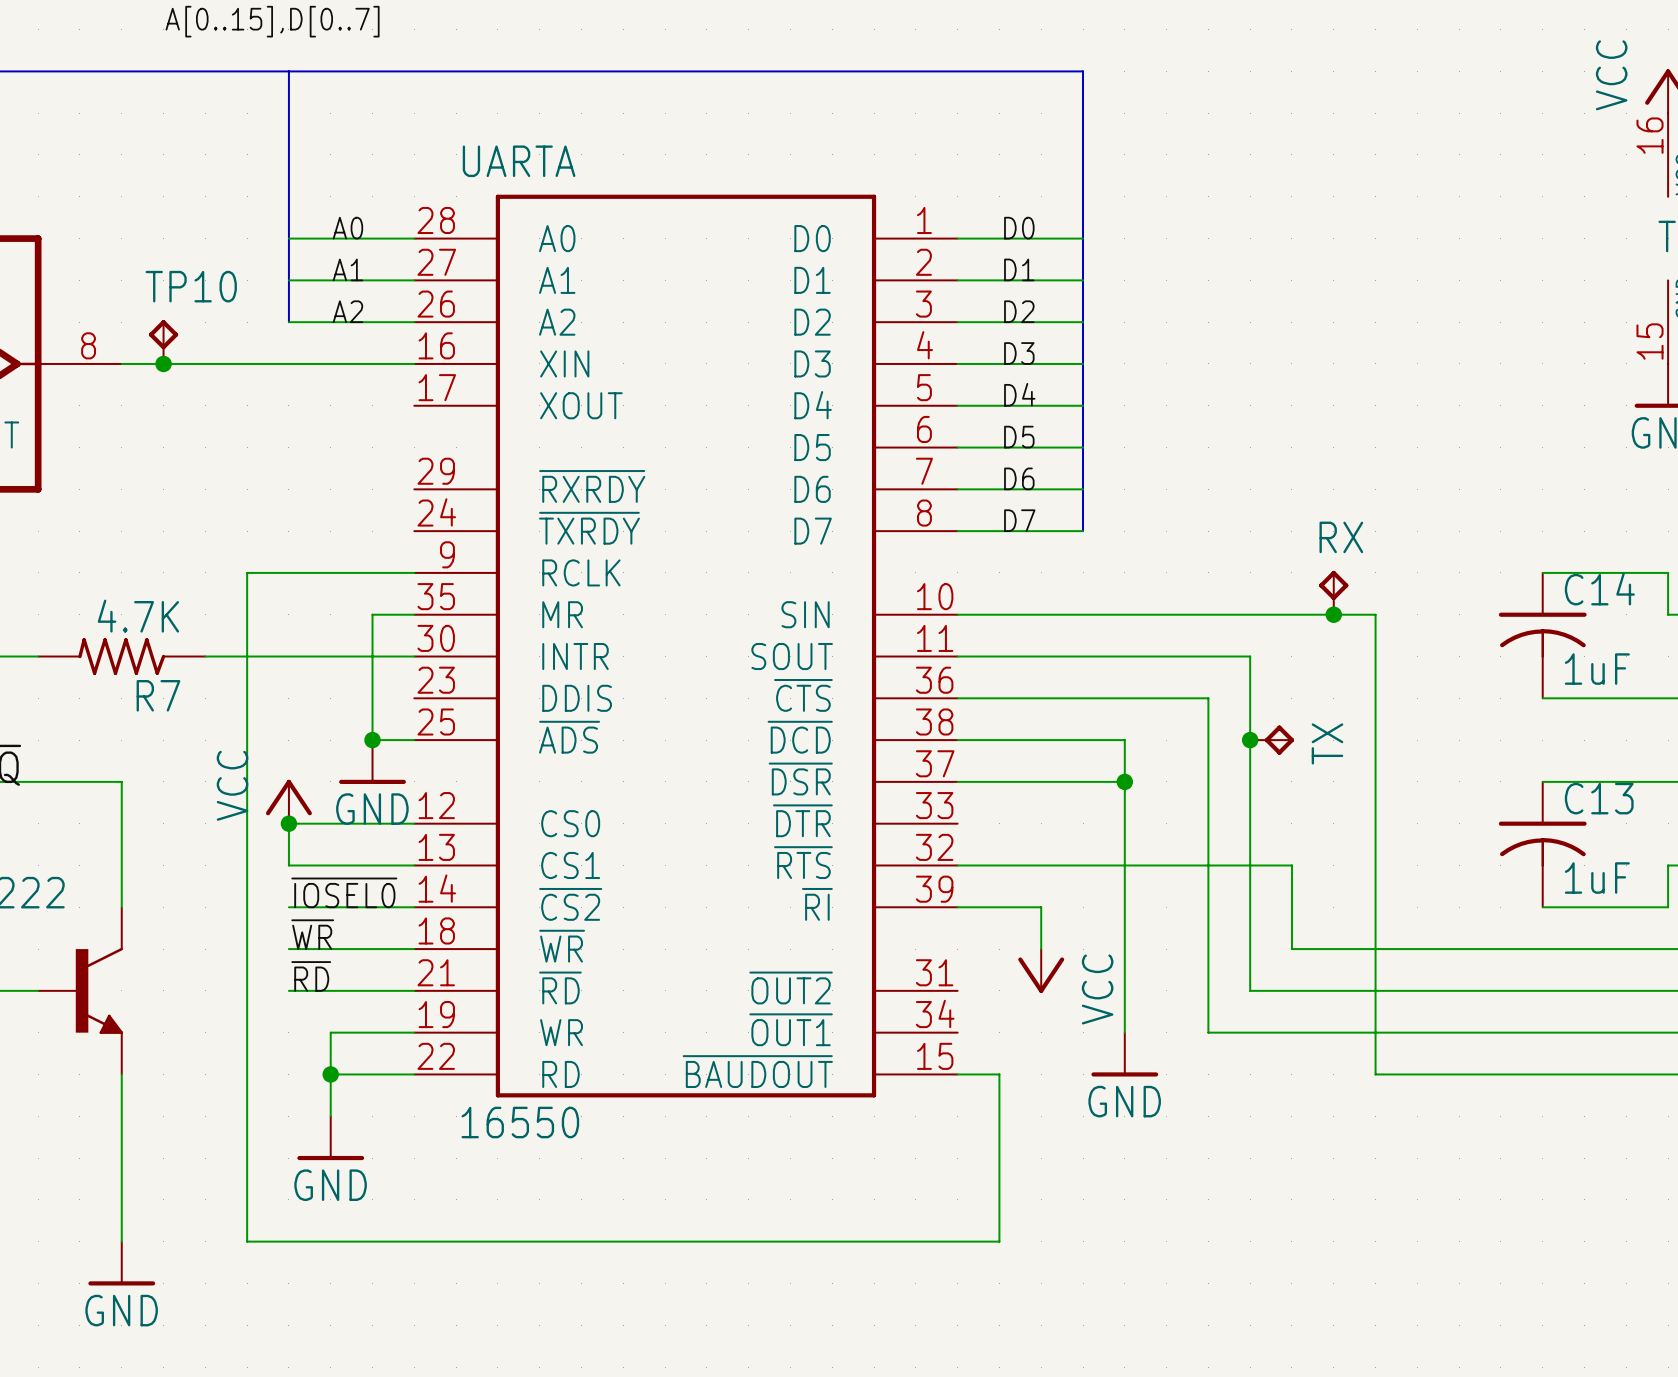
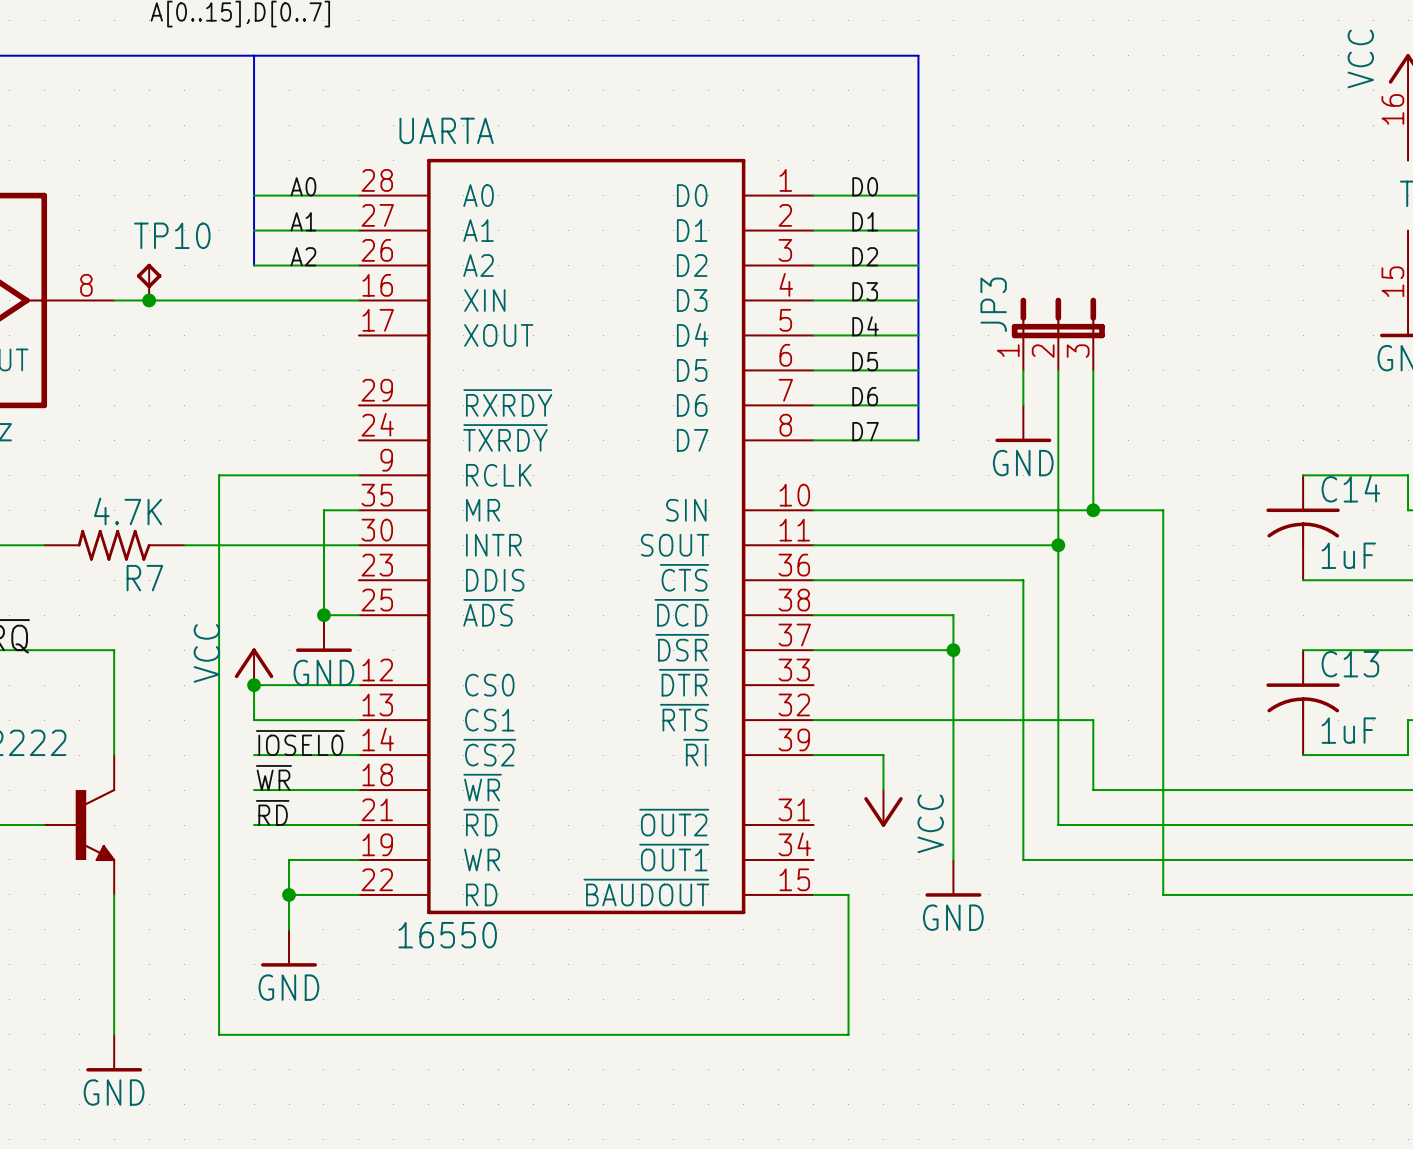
JP3: none -> (1058, 334)
wire: none -> (1023, 370) (1023, 405)
wire: none -> (1058, 370) (1058, 545)
wire: none -> (1093, 370) (1093, 510)
power symbol: none -> GND (1023, 423)
RX: (1333, 592) -> none
junction position: (1333, 614) -> (1093, 510)
junction: none -> (1058, 545)
junction: (1250, 740) -> none
TX: (1272, 740) -> none

